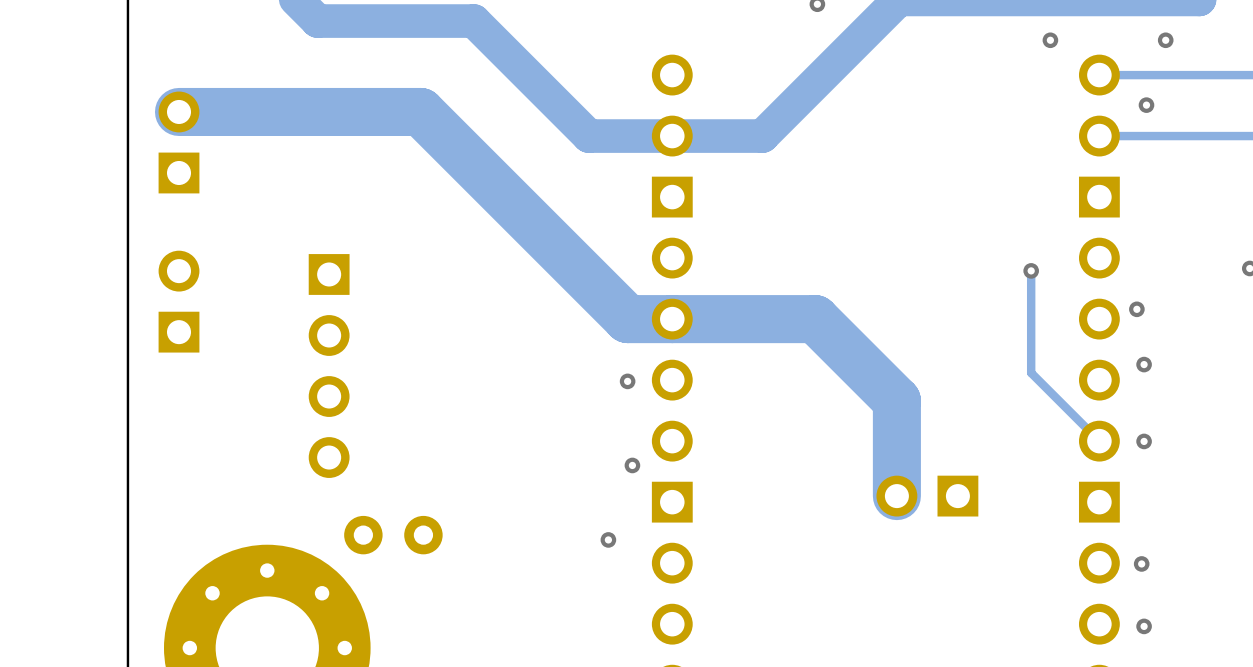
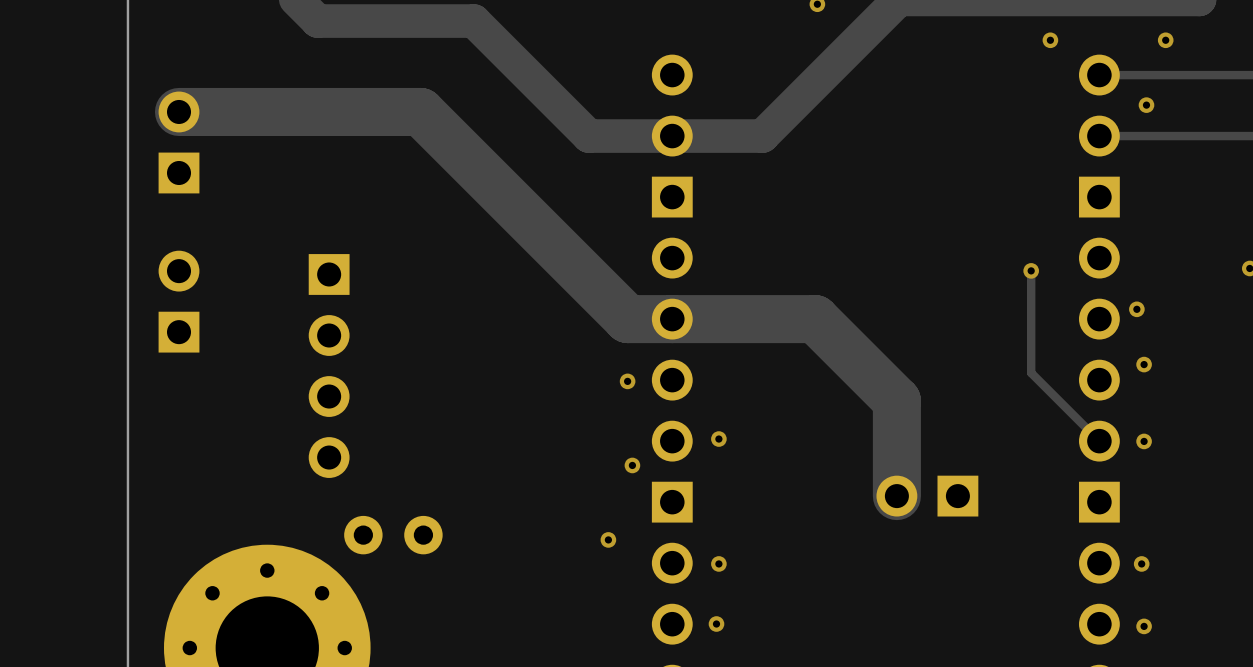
via: none -> (718, 439)
via: none -> (718, 563)
via: none -> (716, 624)

